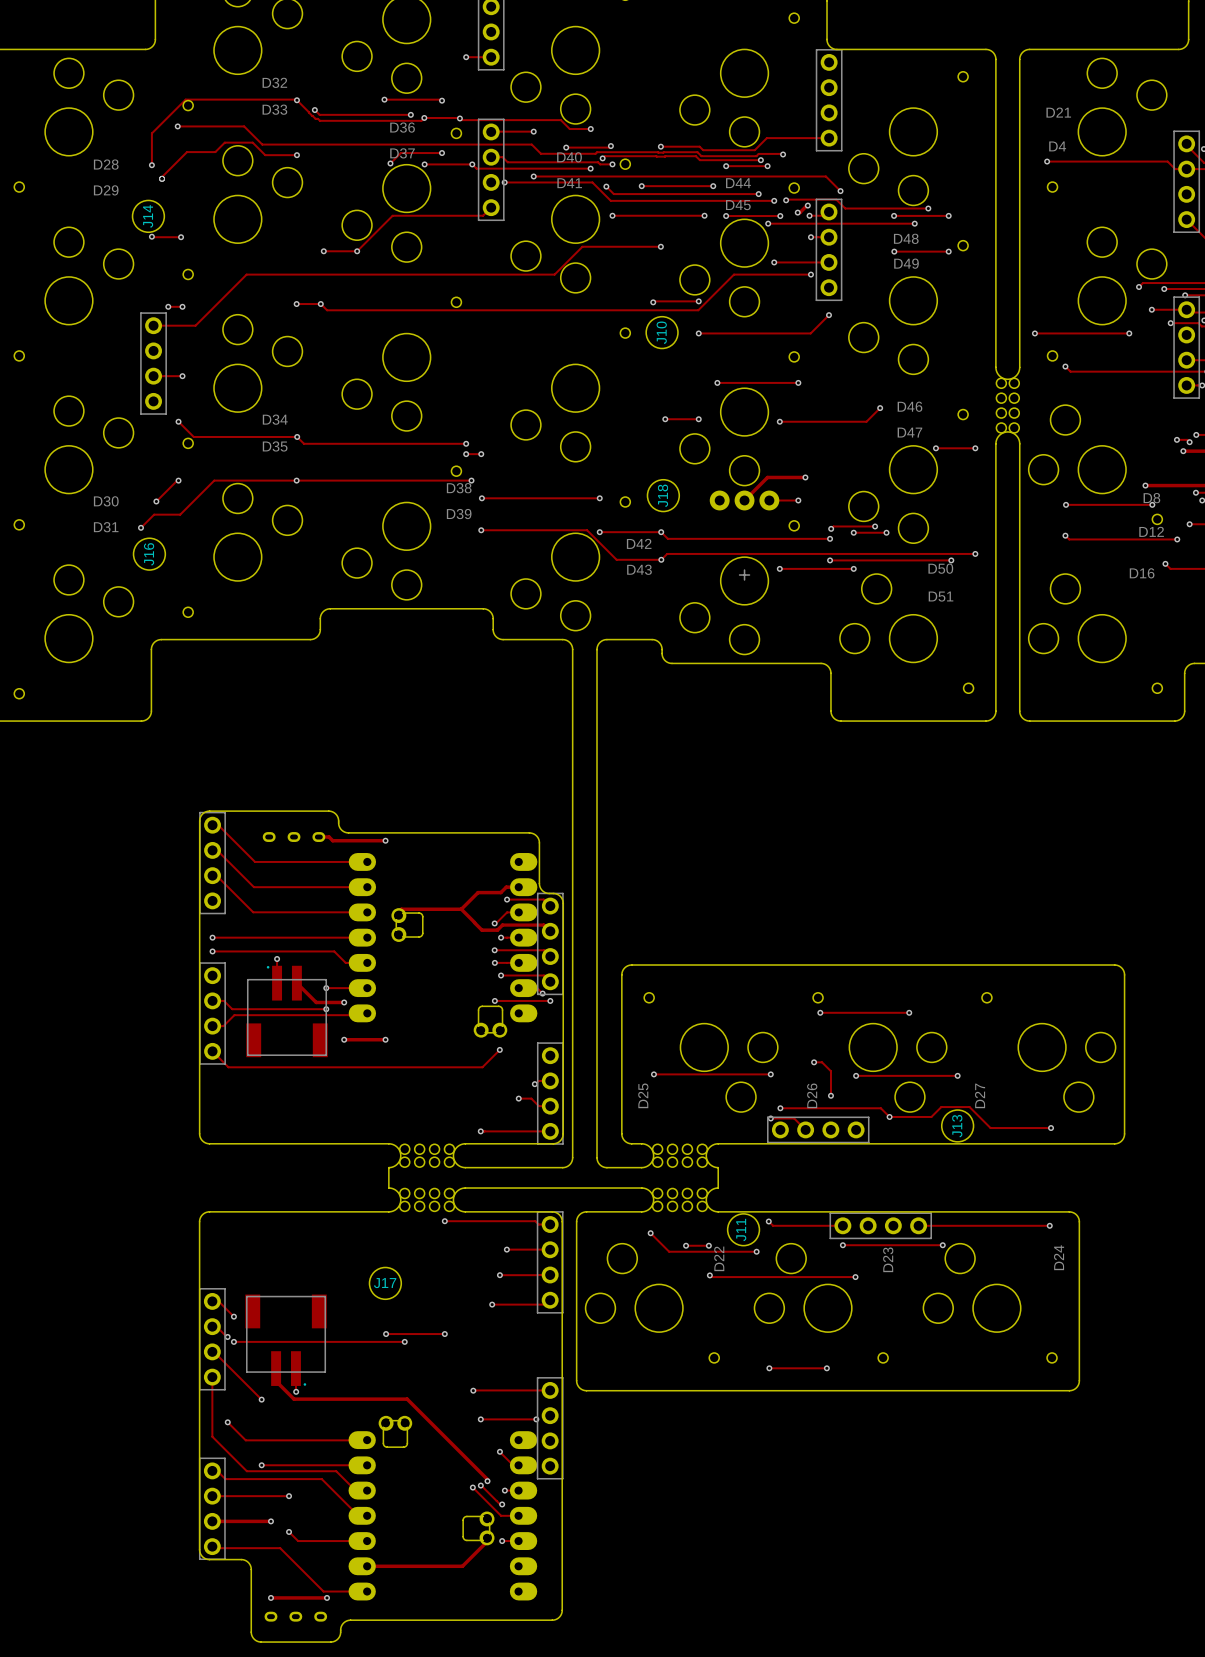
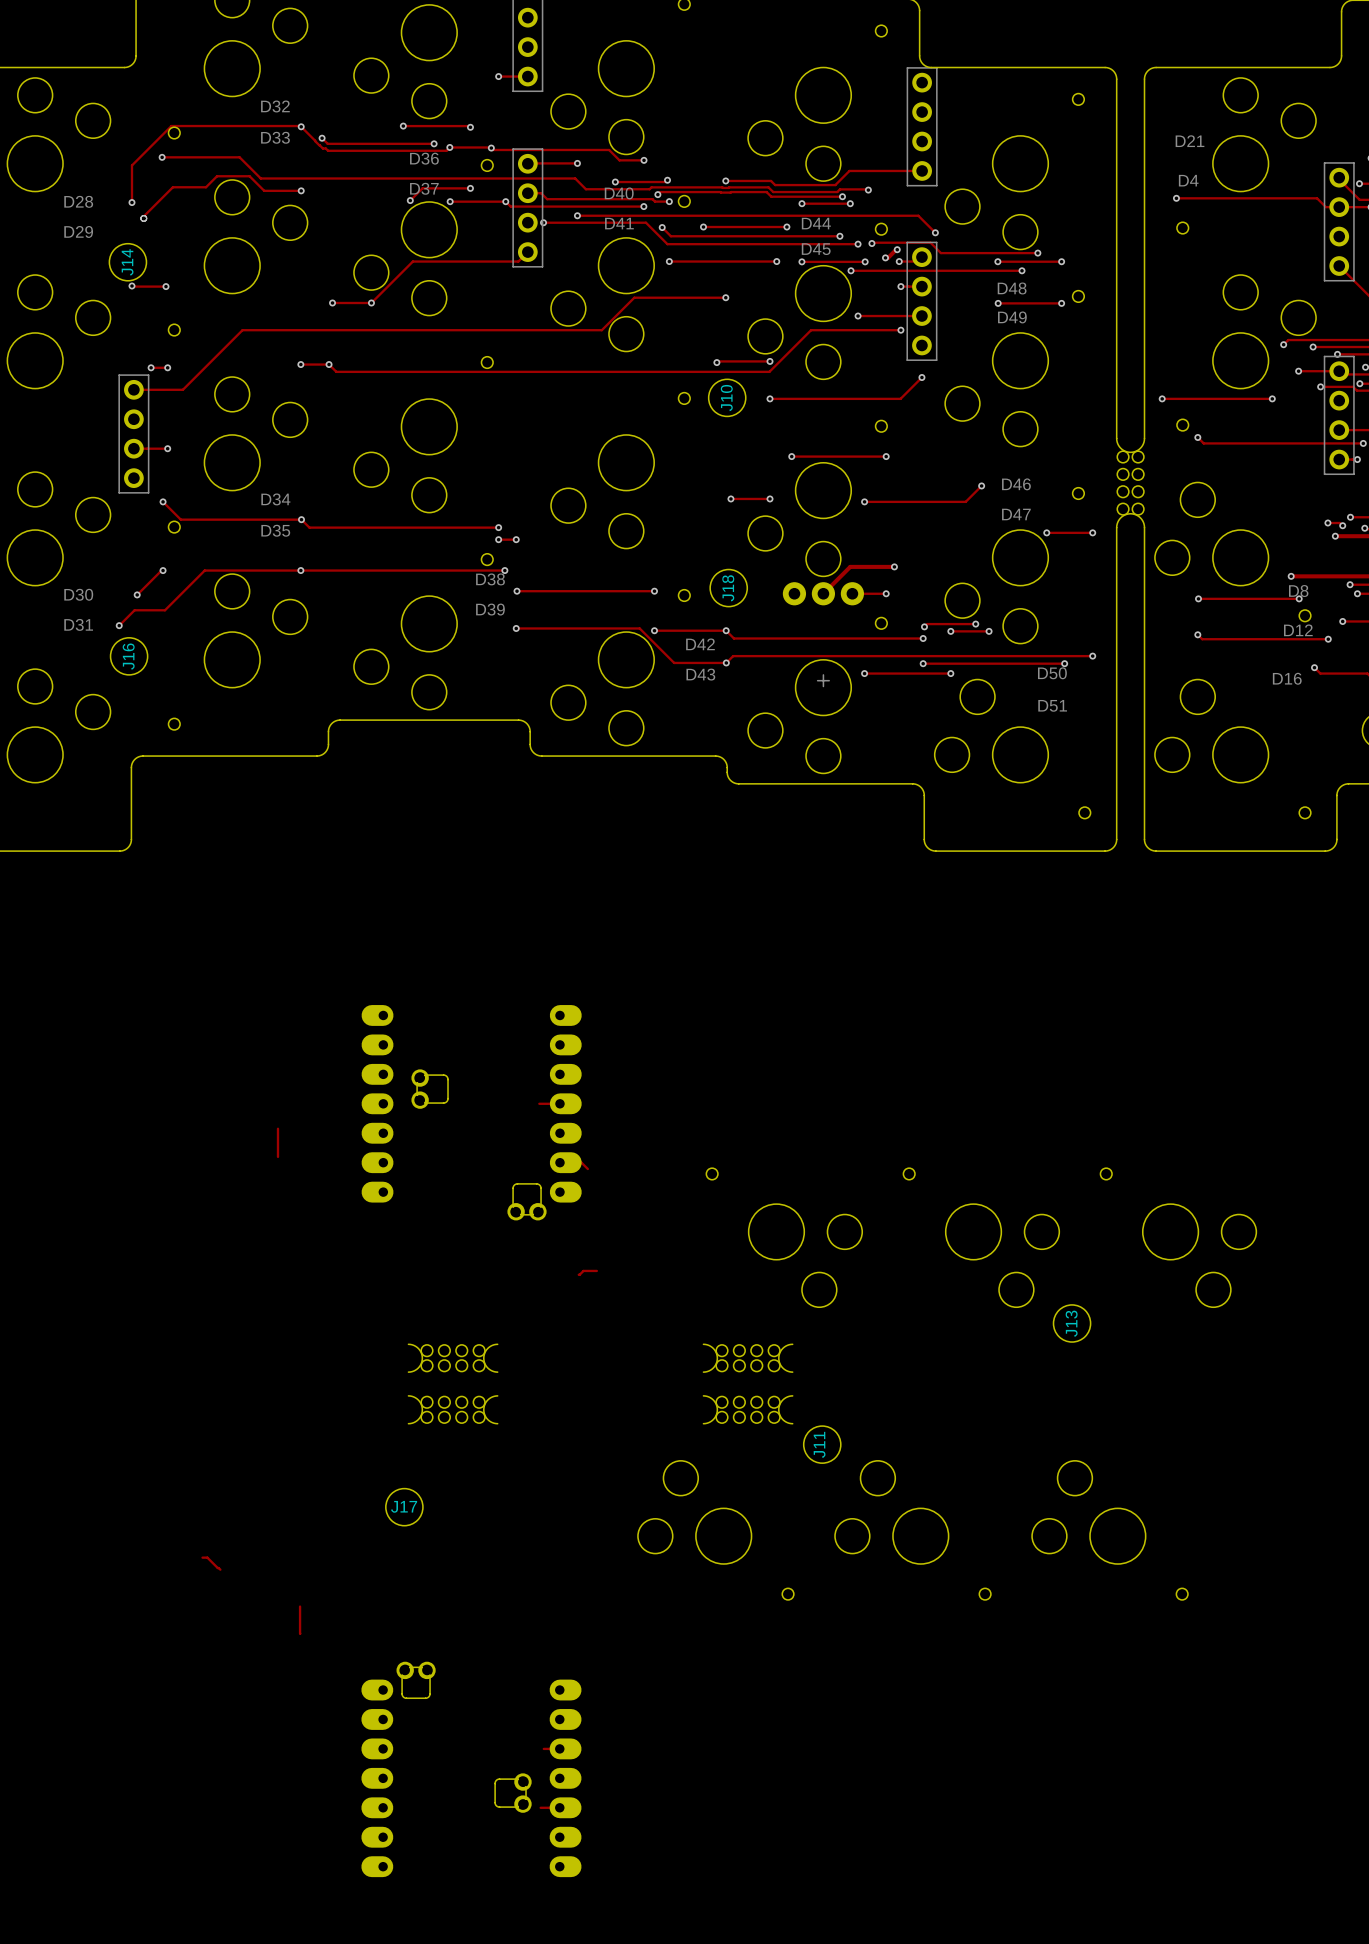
board edge: (562, 639) (569, 642) (572, 649) (572, 1159) (569, 1164) (563, 1167) (465, 1167) -> none
board edge: (606, 639) (599, 642) (597, 649) (597, 1158) (599, 1163) (604, 1167) (641, 1167) -> (662, 756) (611, 756)
track: (212, 825) (219, 826) (255, 861) (367, 861) -> none
part: (294, 837) -> none
track: (318, 837) (329, 837) (332, 840) (385, 840) -> none
via: (385, 840) -> none
track: (212, 850) (217, 850) (253, 887) (367, 887) -> none
part: (212, 863) -> none
track: (212, 875) (216, 875) (253, 912) (367, 912) -> none
track: (518, 887) (506, 887) (500, 892) (478, 892) (461, 909) -> none
track: (507, 899) (543, 899) (550, 906) -> none
via: (507, 899) -> none
track: (461, 909) (481, 930) (497, 930) (502, 925) (543, 925) (550, 931) -> none
track: (461, 909) (401, 909) (398, 915) -> none
track: (518, 912) (507, 912) (494, 923) -> none
via: (494, 923) -> none
track: (212, 937) (367, 937) -> none
via: (212, 937) -> none
via: (501, 937) -> none
part: (550, 943) -> none
track: (494, 950) (544, 950) (550, 956) -> none
via: (494, 950) -> none
track: (212, 951) (334, 951) (345, 962) (367, 962) -> none
via: (212, 951) -> none
via: (277, 959) -> none
track: (494, 962) (518, 962) -> none
via: (494, 962) -> none
track: (501, 975) (544, 975) (550, 981) -> none
via: (501, 975) -> none
track: (296, 983) (316, 1002) (344, 1002) -> none
track: (326, 988) (367, 988) -> none
via: (326, 988) -> none
via: (542, 993) -> none
track: (212, 1000) (223, 1000) (232, 1009) (326, 1009) -> none
track: (494, 1000) (550, 1000) -> none
via: (494, 1000) -> none
via: (550, 1000) -> none
via: (344, 1002) -> none
via: (326, 1009) -> none
part: (286, 1011) -> none
track: (820, 1012) (909, 1012) -> none
via: (820, 1012) -> none
via: (909, 1012) -> none
part: (212, 1013) -> none
track: (367, 1013) (365, 1015) (234, 1015) (223, 1026) (212, 1026) -> none
track: (344, 1039) (385, 1039) -> none
via: (344, 1039) -> none
via: (385, 1039) -> none
track: (499, 1049) (482, 1067) (228, 1067) (212, 1051) -> none
via: (499, 1049) -> none
track: (814, 1062) (822, 1062) (830, 1071) (830, 1095) -> none
via: (814, 1062) -> none
track: (653, 1074) (770, 1074) -> none
via: (653, 1074) -> none
via: (770, 1074) -> none
track: (856, 1075) (957, 1075) -> none
via: (856, 1075) -> none
via: (957, 1075) -> none
via: (534, 1084) -> none
part: (550, 1093) -> none
D25: (643, 1095) -> none
D26: (812, 1095) -> none
via: (830, 1095) -> none
D27: (980, 1095) -> none
track: (518, 1098) (531, 1098) (538, 1106) (550, 1106) -> none
via: (518, 1098) -> none
track: (780, 1108) (880, 1108) (889, 1116) (931, 1116) (941, 1107) (969, 1107) (990, 1128) (1051, 1128) -> none
via: (780, 1108) -> none
via: (889, 1116) -> none
track: (770, 1118) (794, 1118) (805, 1129) -> none
via: (770, 1118) -> none
via: (1051, 1128) -> none
part: (818, 1129) -> none
via: (480, 1131) -> none
board edge: (388, 1143) (209, 1143) (201, 1139) (199, 821) (204, 812) (329, 811) (337, 815) (340, 829) (347, 832) (529, 832) (537, 836) (539, 842) (539, 886) (545, 892) (558, 895) (563, 902) (562, 1136) (559, 1141) (554, 1143) (465, 1143) -> none
board edge: (641, 1143) (627, 1142) (621, 1134) (621, 974) (624, 968) (628, 965) (1114, 965) (1119, 966) (1123, 970) (1124, 1133) (1123, 1139) (1118, 1142) (718, 1143) -> none
board edge: (388, 1167) (388, 1188) -> none
board edge: (718, 1167) (718, 1188) -> none
board edge: (465, 1188) (641, 1188) -> none
board edge: (388, 1211) (209, 1211) (204, 1213) (200, 1218) (199, 1550) (201, 1555) (207, 1559) (242, 1559) (249, 1564) (251, 1633) (253, 1638) (257, 1641) (332, 1641) (339, 1637) (342, 1623) (349, 1620) (552, 1620) (557, 1618) (561, 1614) (561, 1219) (558, 1214) (553, 1211) (465, 1211) -> none
board edge: (641, 1211) (585, 1211) (580, 1214) (577, 1218) (576, 1380) (578, 1386) (583, 1390) (1069, 1390) (1074, 1389) (1078, 1385) (1079, 1221) (1077, 1216) (1073, 1212) (718, 1211) -> none
track: (444, 1221) (535, 1221) (538, 1224) (550, 1224) -> none
via: (444, 1221) -> none
track: (768, 1221) (773, 1225) (842, 1225) -> none
via: (768, 1221) -> none
part: (880, 1225) -> none
track: (918, 1225) (1049, 1225) -> none
via: (1049, 1225) -> none
track: (650, 1233) (669, 1251) (756, 1251) -> none
via: (650, 1233) -> none
track: (686, 1245) (708, 1245) -> none
via: (686, 1245) -> none
via: (708, 1245) -> none
track: (842, 1245) (942, 1245) -> none
via: (842, 1245) -> none
via: (942, 1245) -> none
track: (506, 1249) (550, 1249) -> none
via: (506, 1249) -> none
via: (756, 1251) -> none
D24: (1059, 1257) -> none
D22: (719, 1258) -> none
D23: (888, 1259) -> none
part: (550, 1262) -> none
track: (550, 1274) (499, 1275) -> none
via: (499, 1275) -> none
track: (709, 1275) (711, 1277) (855, 1277) -> none
via: (709, 1275) -> none
via: (855, 1277) -> none
track: (550, 1300) (545, 1304) (492, 1304) -> none
track: (212, 1301) (218, 1301) (233, 1316) -> none
via: (492, 1304) -> none
via: (233, 1316) -> none
track: (386, 1334) (444, 1334) -> none
via: (386, 1334) -> none
via: (444, 1334) -> none
via: (227, 1336) -> none
part: (212, 1339) -> none
part: (286, 1340) -> none
track: (233, 1341) (404, 1341) -> none
via: (233, 1341) -> none
via: (404, 1341) -> none
track: (212, 1351) (261, 1399) -> none
track: (276, 1368) (276, 1381) (293, 1399) (407, 1399) (487, 1481) -> none
track: (769, 1368) (826, 1368) -> none
via: (769, 1368) -> none
via: (826, 1368) -> none
track: (212, 1377) (212, 1436) (246, 1471) (336, 1471) (355, 1490) (367, 1490) -> none
via: (473, 1390) -> none
track: (550, 1390) (473, 1390) -> none
via: (296, 1391) -> none
via: (261, 1399) -> none
track: (480, 1419) (536, 1419) -> none
via: (480, 1419) -> none
via: (536, 1419) -> none
track: (227, 1422) (245, 1440) (367, 1440) -> none
via: (227, 1422) -> none
part: (550, 1428) -> none
track: (499, 1451) (513, 1465) (518, 1465) -> none
via: (499, 1451) -> none
track: (261, 1465) (367, 1465) -> none
via: (261, 1465) -> none
track: (212, 1470) (217, 1470) (225, 1479) (321, 1479) (358, 1515) (367, 1515) -> none
via: (487, 1481) -> none
track: (480, 1485) (502, 1504) -> none
via: (480, 1485) -> none
track: (472, 1487) (501, 1515) (518, 1515) -> none
via: (472, 1487) -> none
via: (504, 1490) -> none
track: (212, 1496) (289, 1496) -> none
via: (289, 1496) -> none
via: (502, 1504) -> none
part: (212, 1508) -> none
track: (212, 1521) (270, 1521) -> none
via: (270, 1521) -> none
track: (289, 1531) (298, 1541) (367, 1541) -> none
via: (289, 1531) -> none
track: (487, 1537) (487, 1541) (462, 1566) (367, 1566) -> none
via: (502, 1541) -> none
track: (212, 1546) (213, 1548) (280, 1548) (323, 1591) (367, 1591) -> none
track: (270, 1597) (327, 1597) -> none
via: (270, 1597) -> none
via: (327, 1597) -> none
part: (295, 1616) -> none

